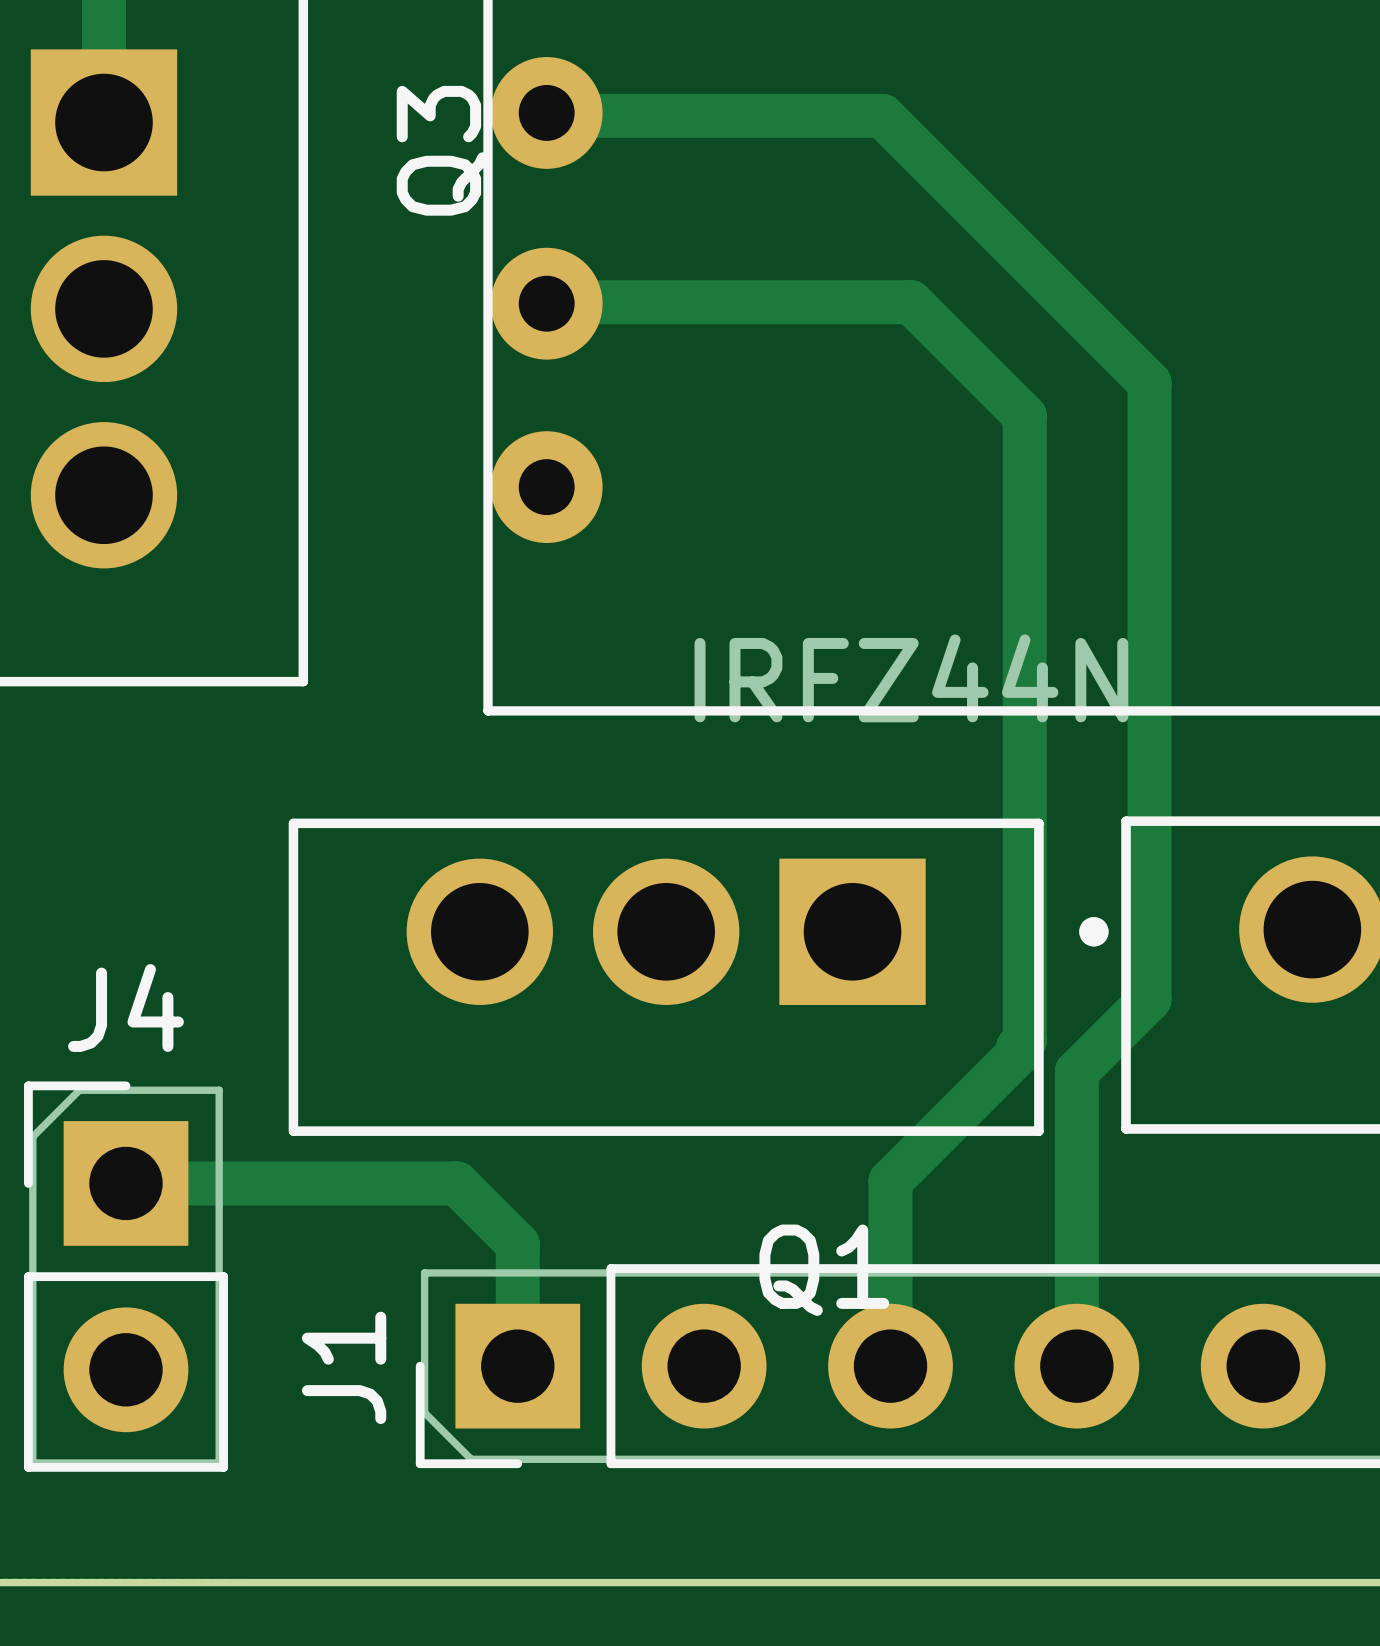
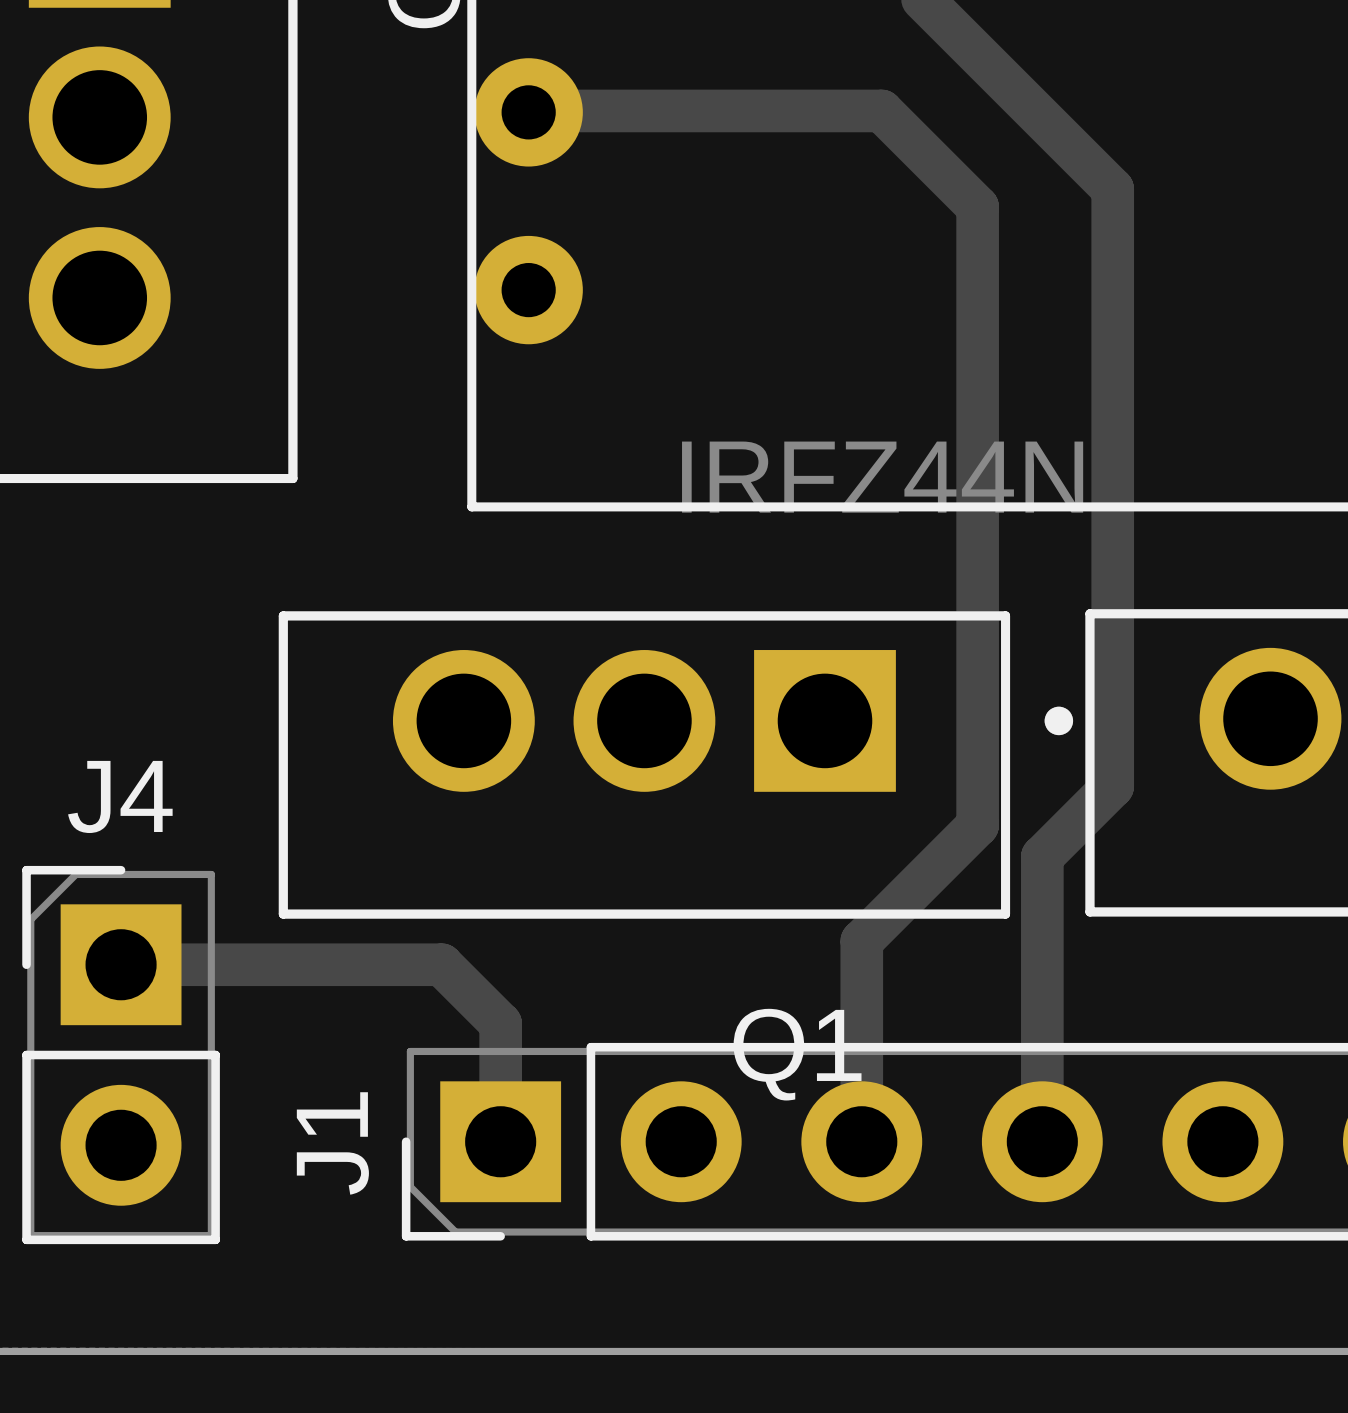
track: (1010, 401) (1024, 416) (1024, 1041) (1018, 1047) (1018, 1053) (890, 1181) -> (977, 206) (977, 825) (861, 941) (861, 962)

